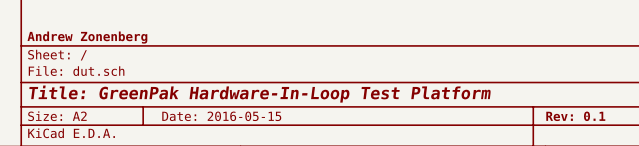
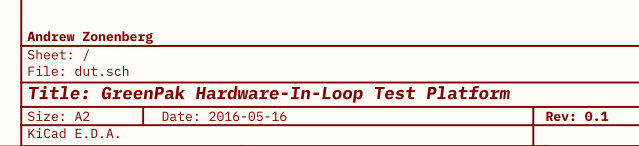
title block: Date: 2016-05-15 (221, 116) -> Date: 2016-05-16 (224, 116)

